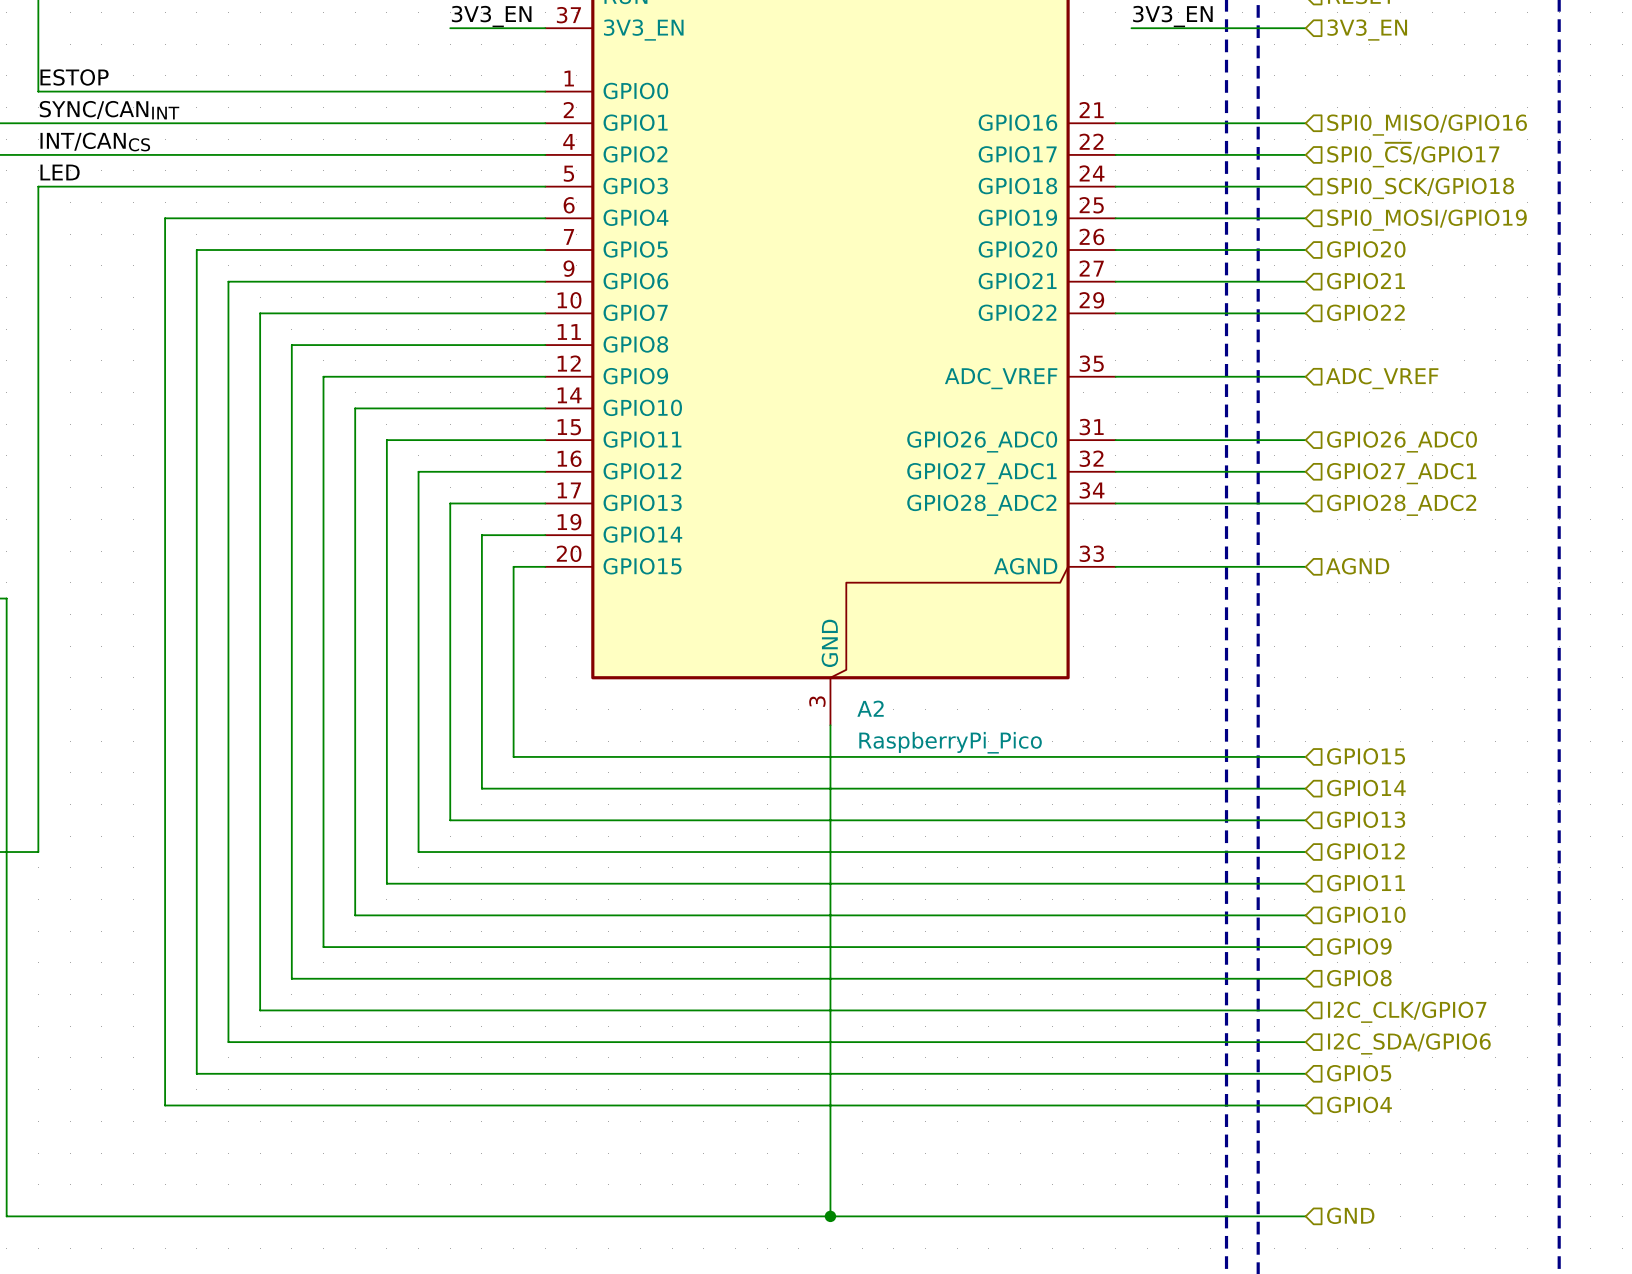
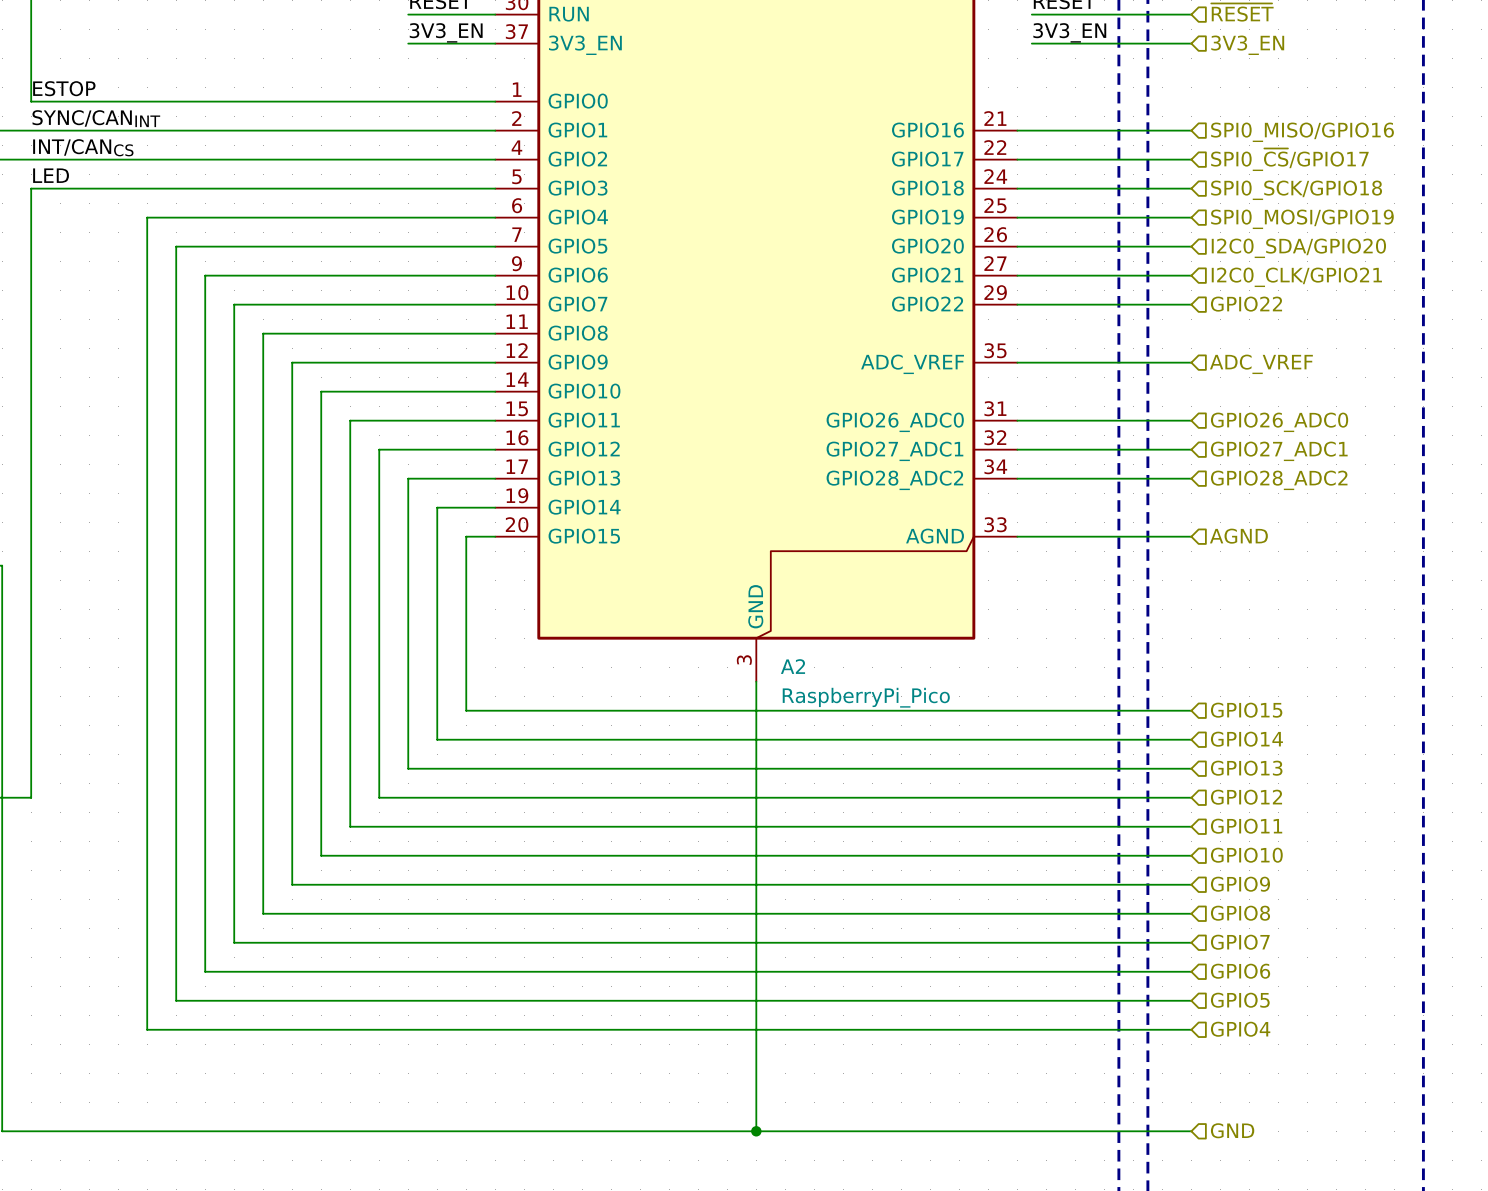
hierarchical label: GPIO20 (1366, 249) -> I2C0_SDA/GPIO20 (1298, 248)
hierarchical label: GPIO21 (1366, 281) -> I2C0_CLK/GPIO21 (1296, 277)
hierarchical label: I2C_CLK/GPIO7 (1407, 1012) -> GPIO7 (1240, 942)
hierarchical label: I2C_SDA/GPIO6 (1409, 1043) -> GPIO6 (1240, 971)

